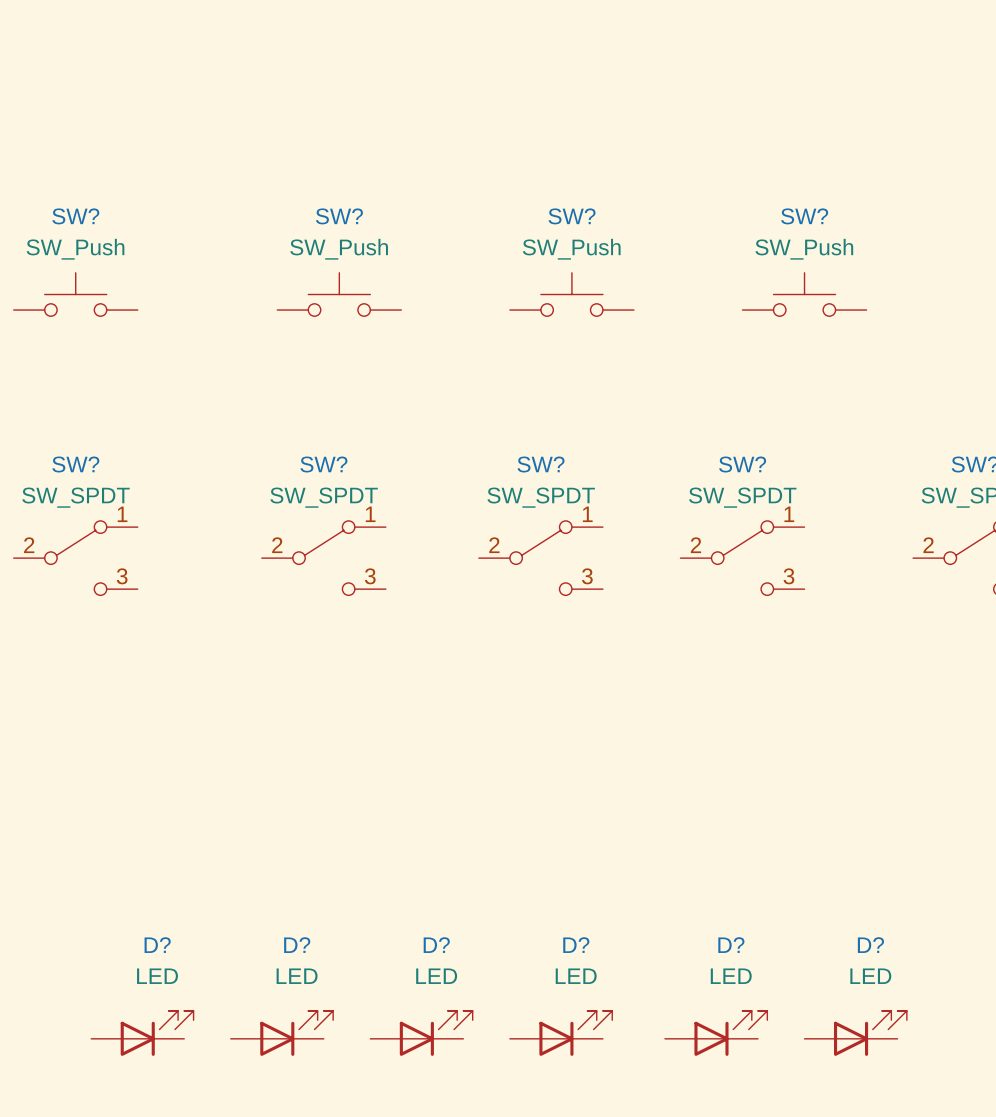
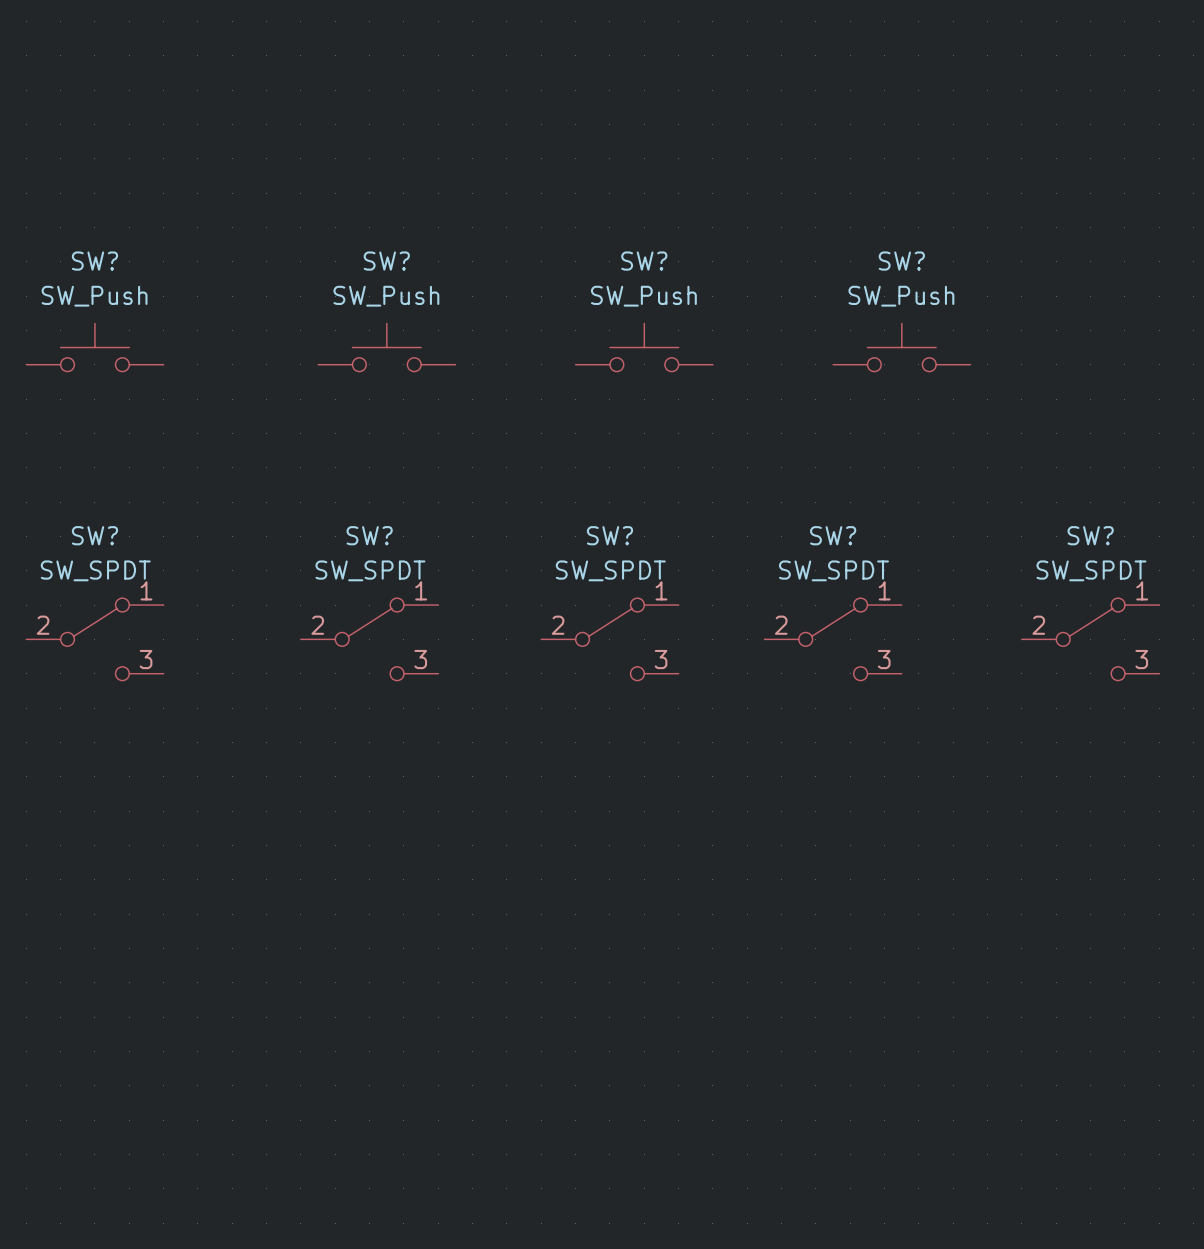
D?: LED (142, 1033) -> none
D?: LED (281, 1033) -> none
D?: LED (421, 1033) -> none
D?: LED (561, 1033) -> none
D?: LED (716, 1033) -> none
D?: LED (855, 1033) -> none

